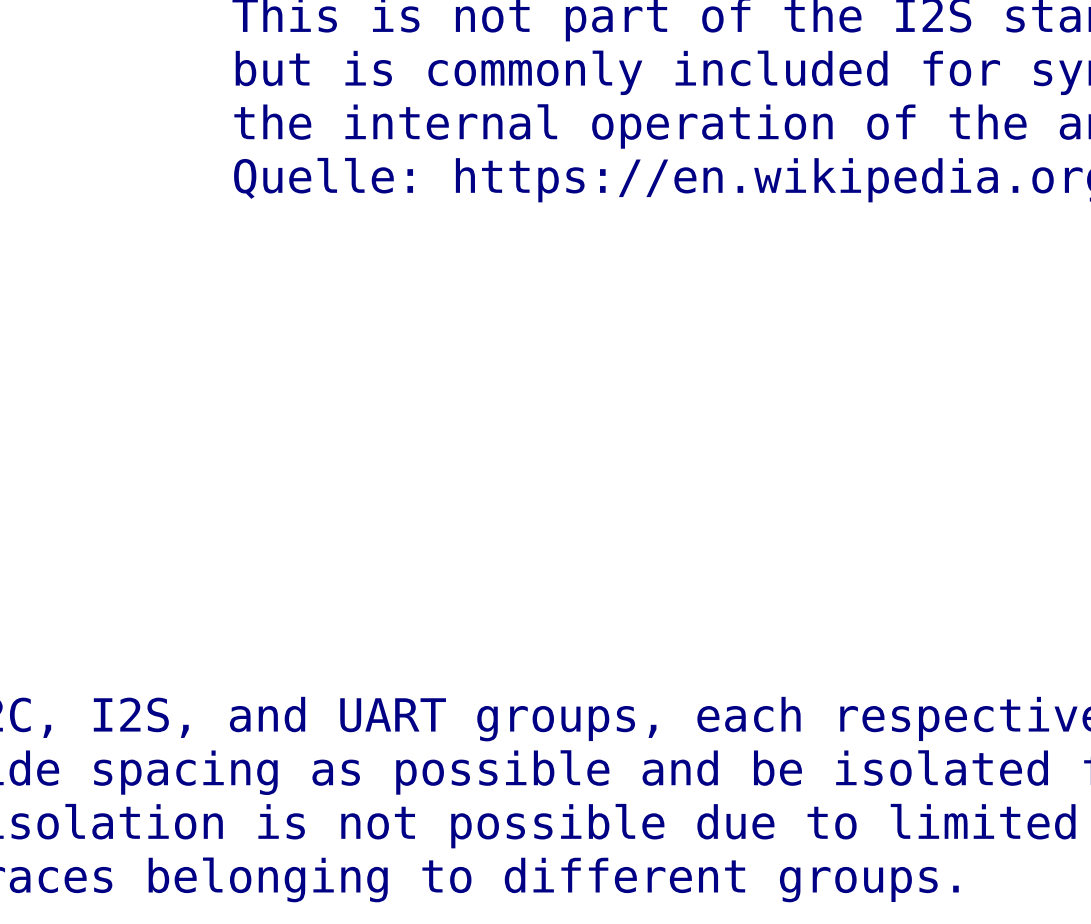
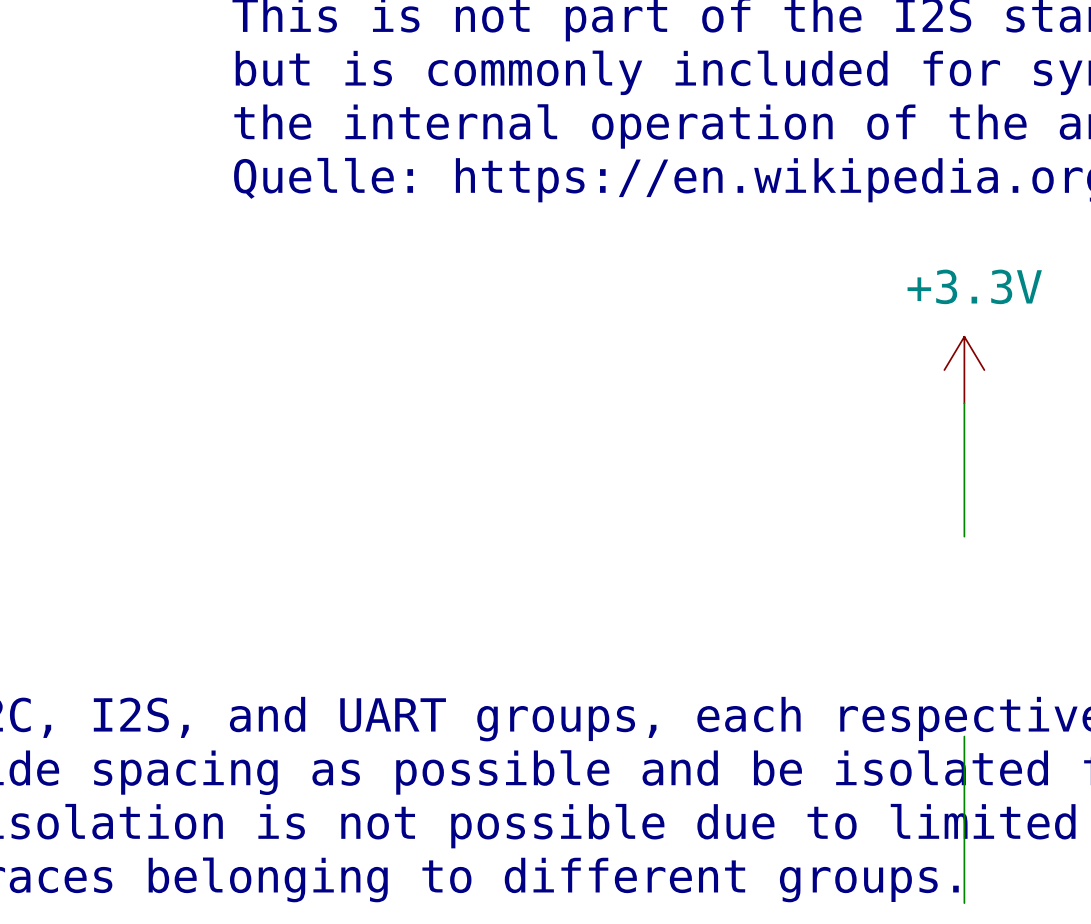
power symbol: none -> +3.3V (964, 370)
wire: none -> (964, 403) (964, 536)
wire: none -> (964, 736) (964, 903)

